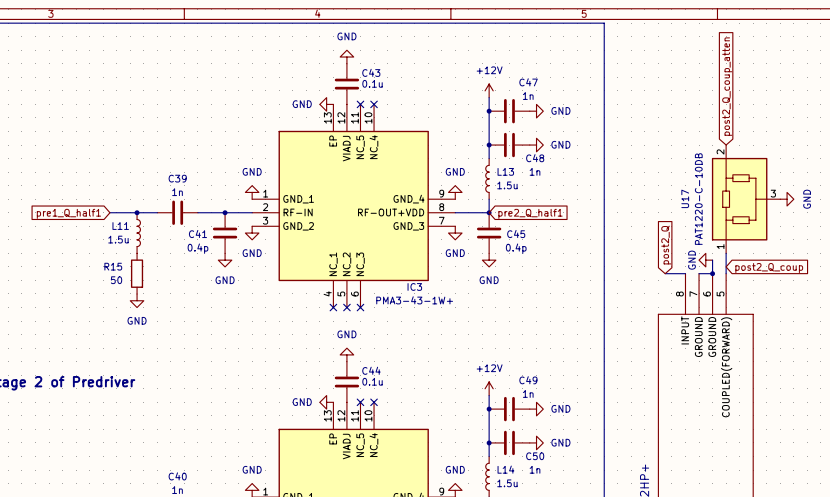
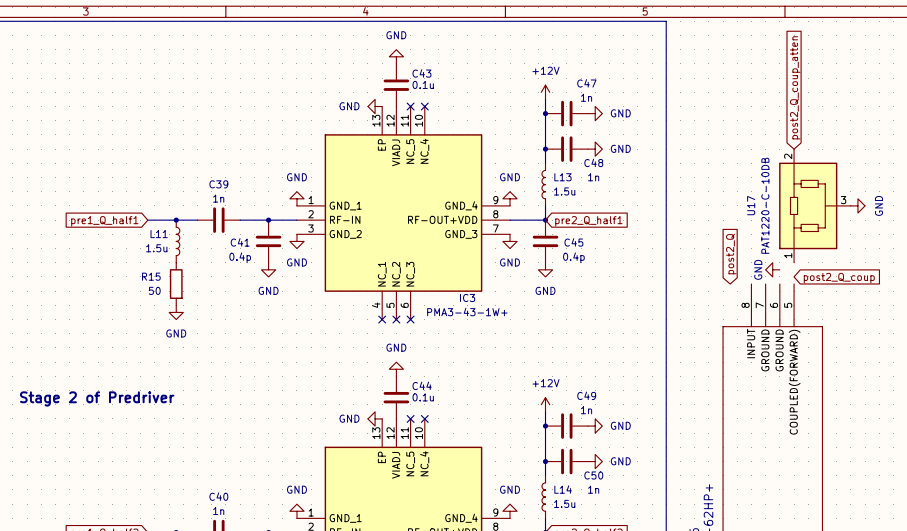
wire: (726, 253) (726, 273) -> none
wire: (712, 260) (712, 273) (699, 273) -> none
wire: (665, 273) (685, 273) -> none
junction: (712, 273) -> none

